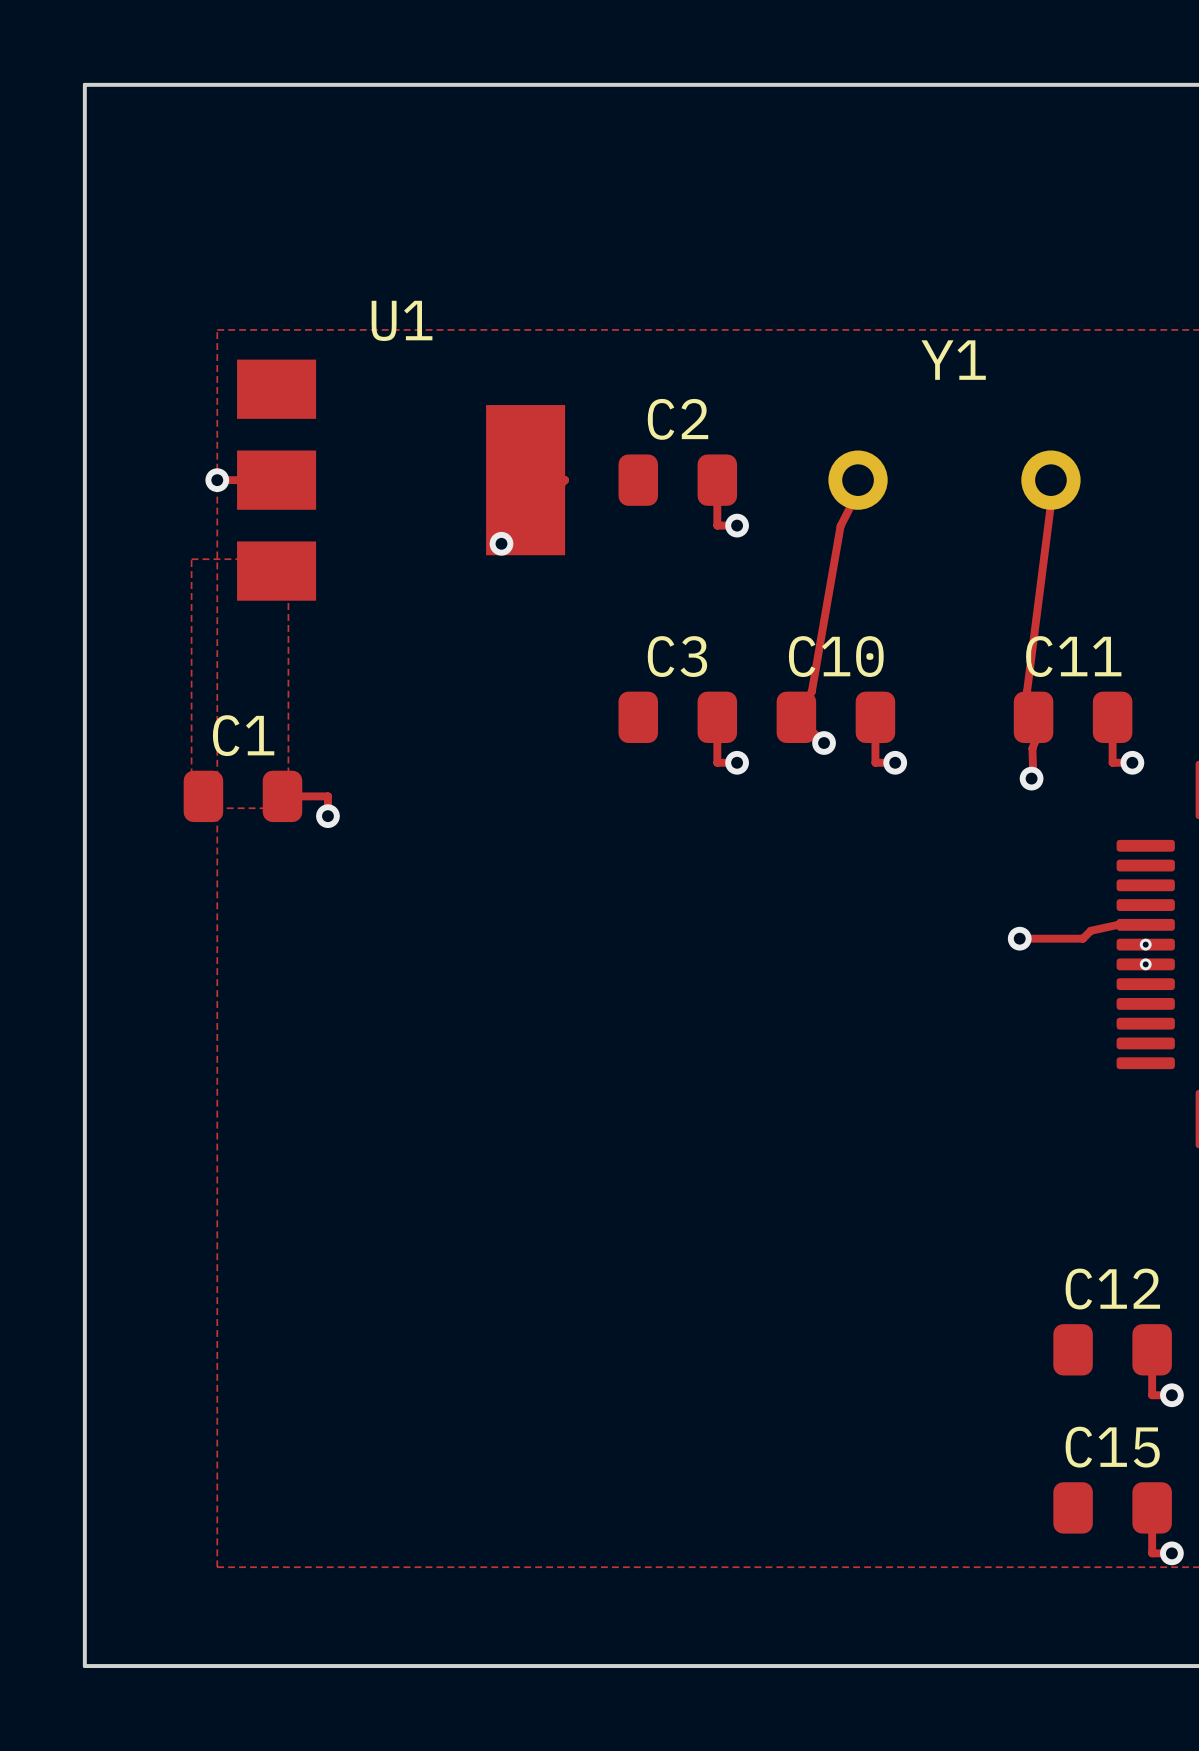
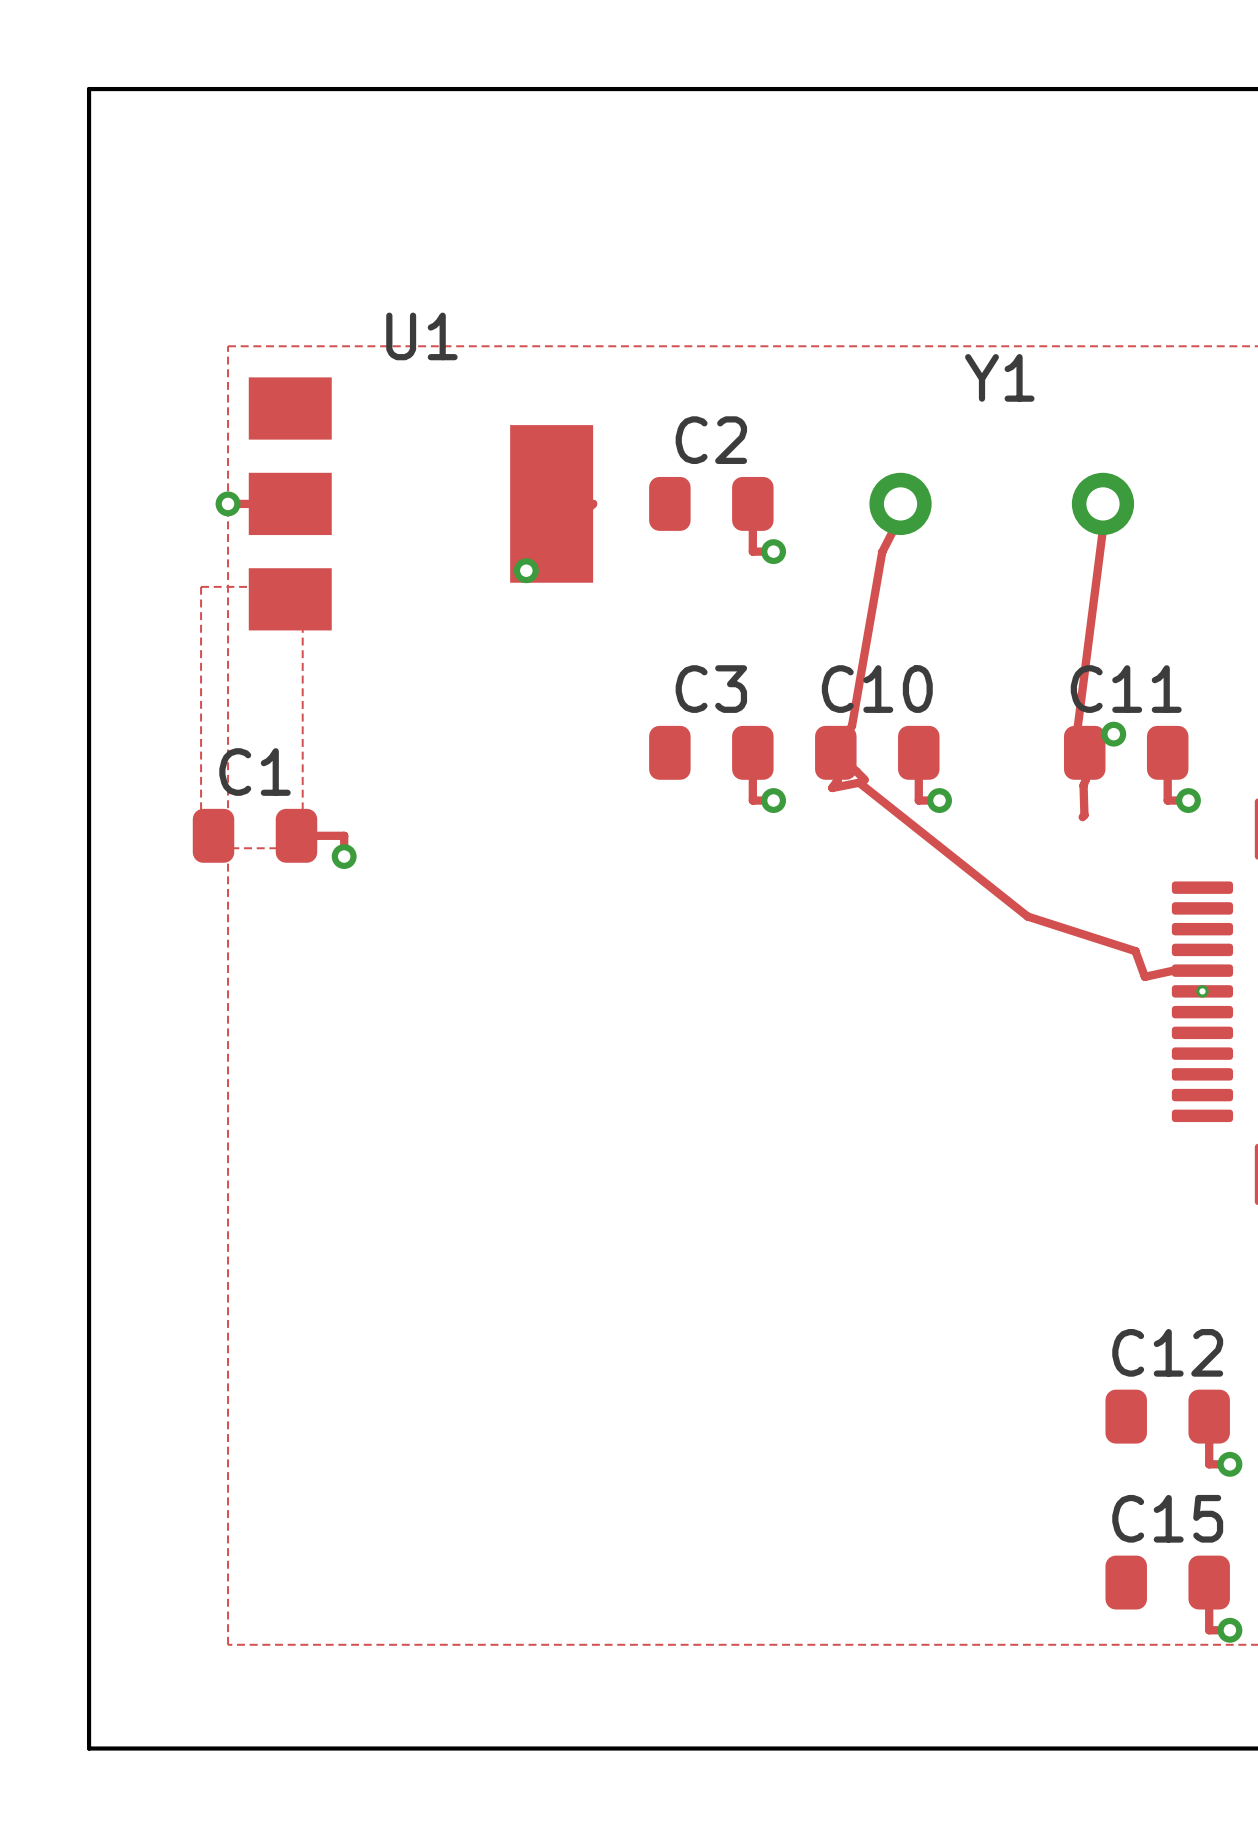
via: (824, 743) -> none
via position: (1031, 778) -> (1113, 734)
track: (1090, 930) (1082, 938) (1019, 938) -> (1144, 976) (1135, 951) (1027, 916) (859, 782) (832, 788) (837, 779) (835, 752)
via: (1019, 938) -> none
via: (1145, 964) -> none

